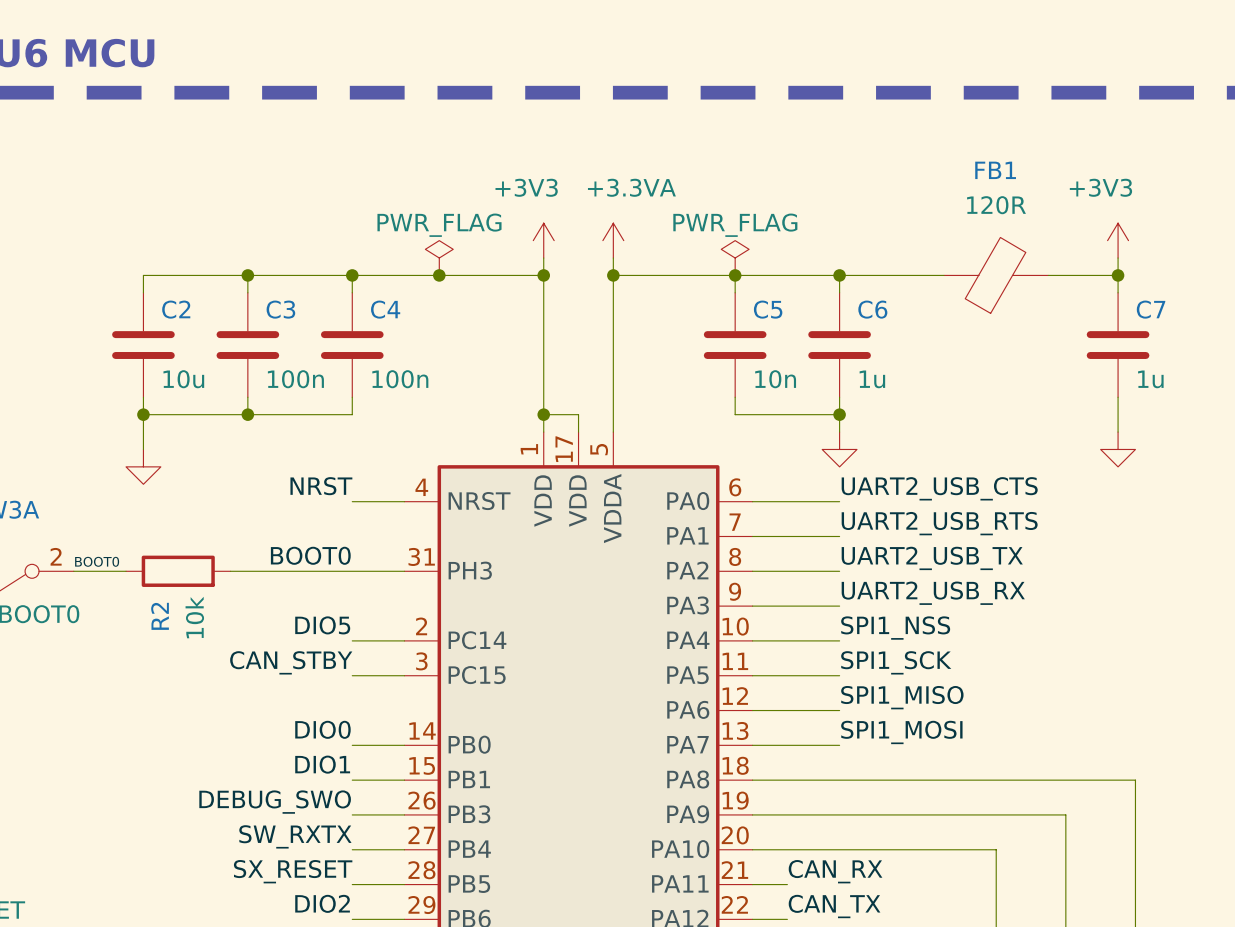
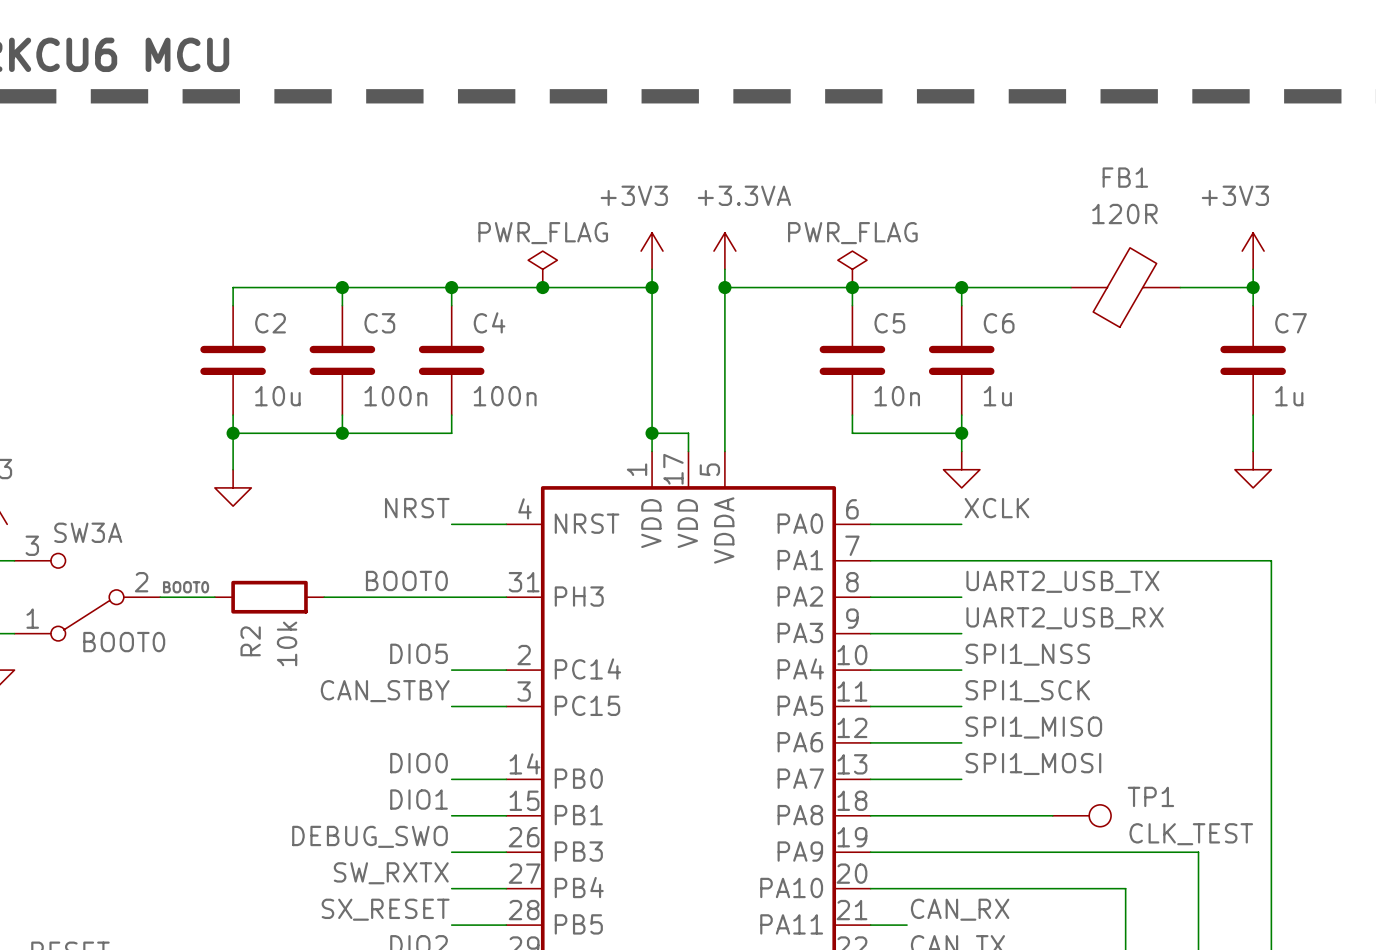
label: UART2_USB_CTS (939, 488) -> XCLK (996, 508)
label: UART2_USB_RTS (939, 523) -> none
wire: (926, 780) (1135, 780) -> (961, 560) (1271, 560) (1271, 815)
TP1: none -> CLK_TEST (1081, 815)

